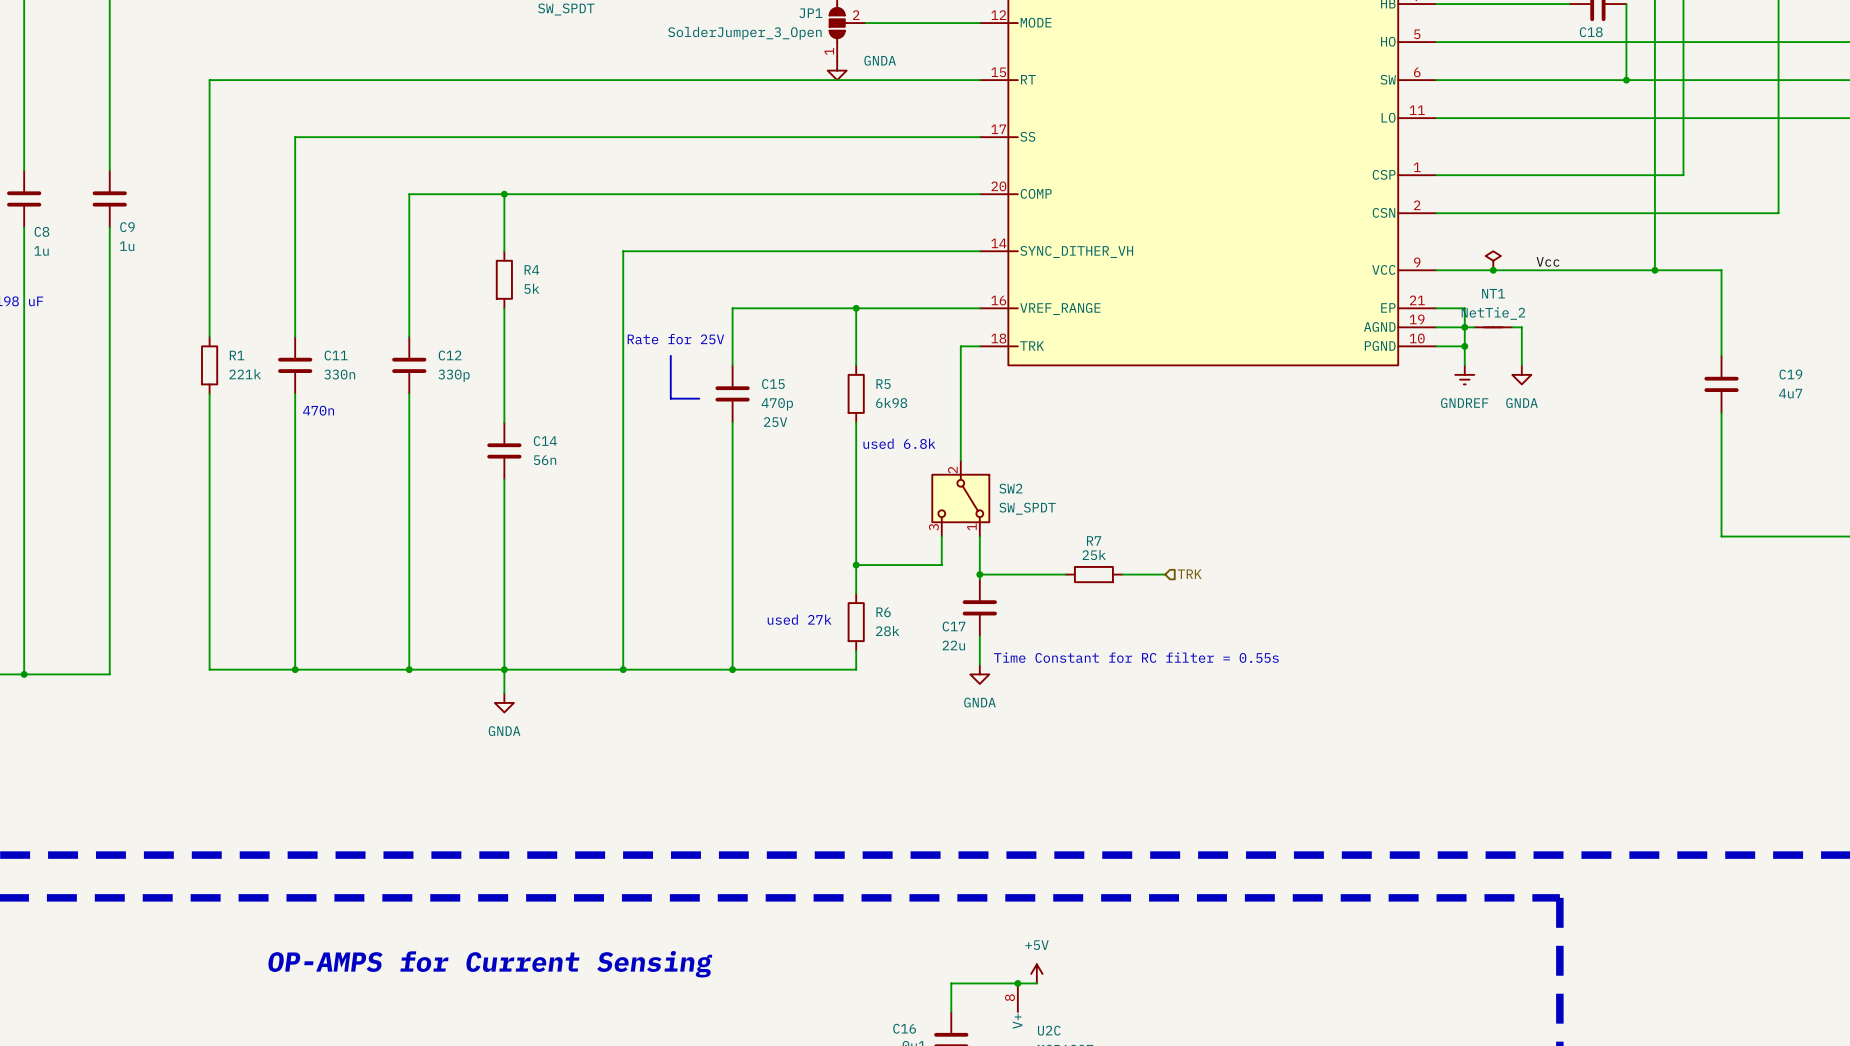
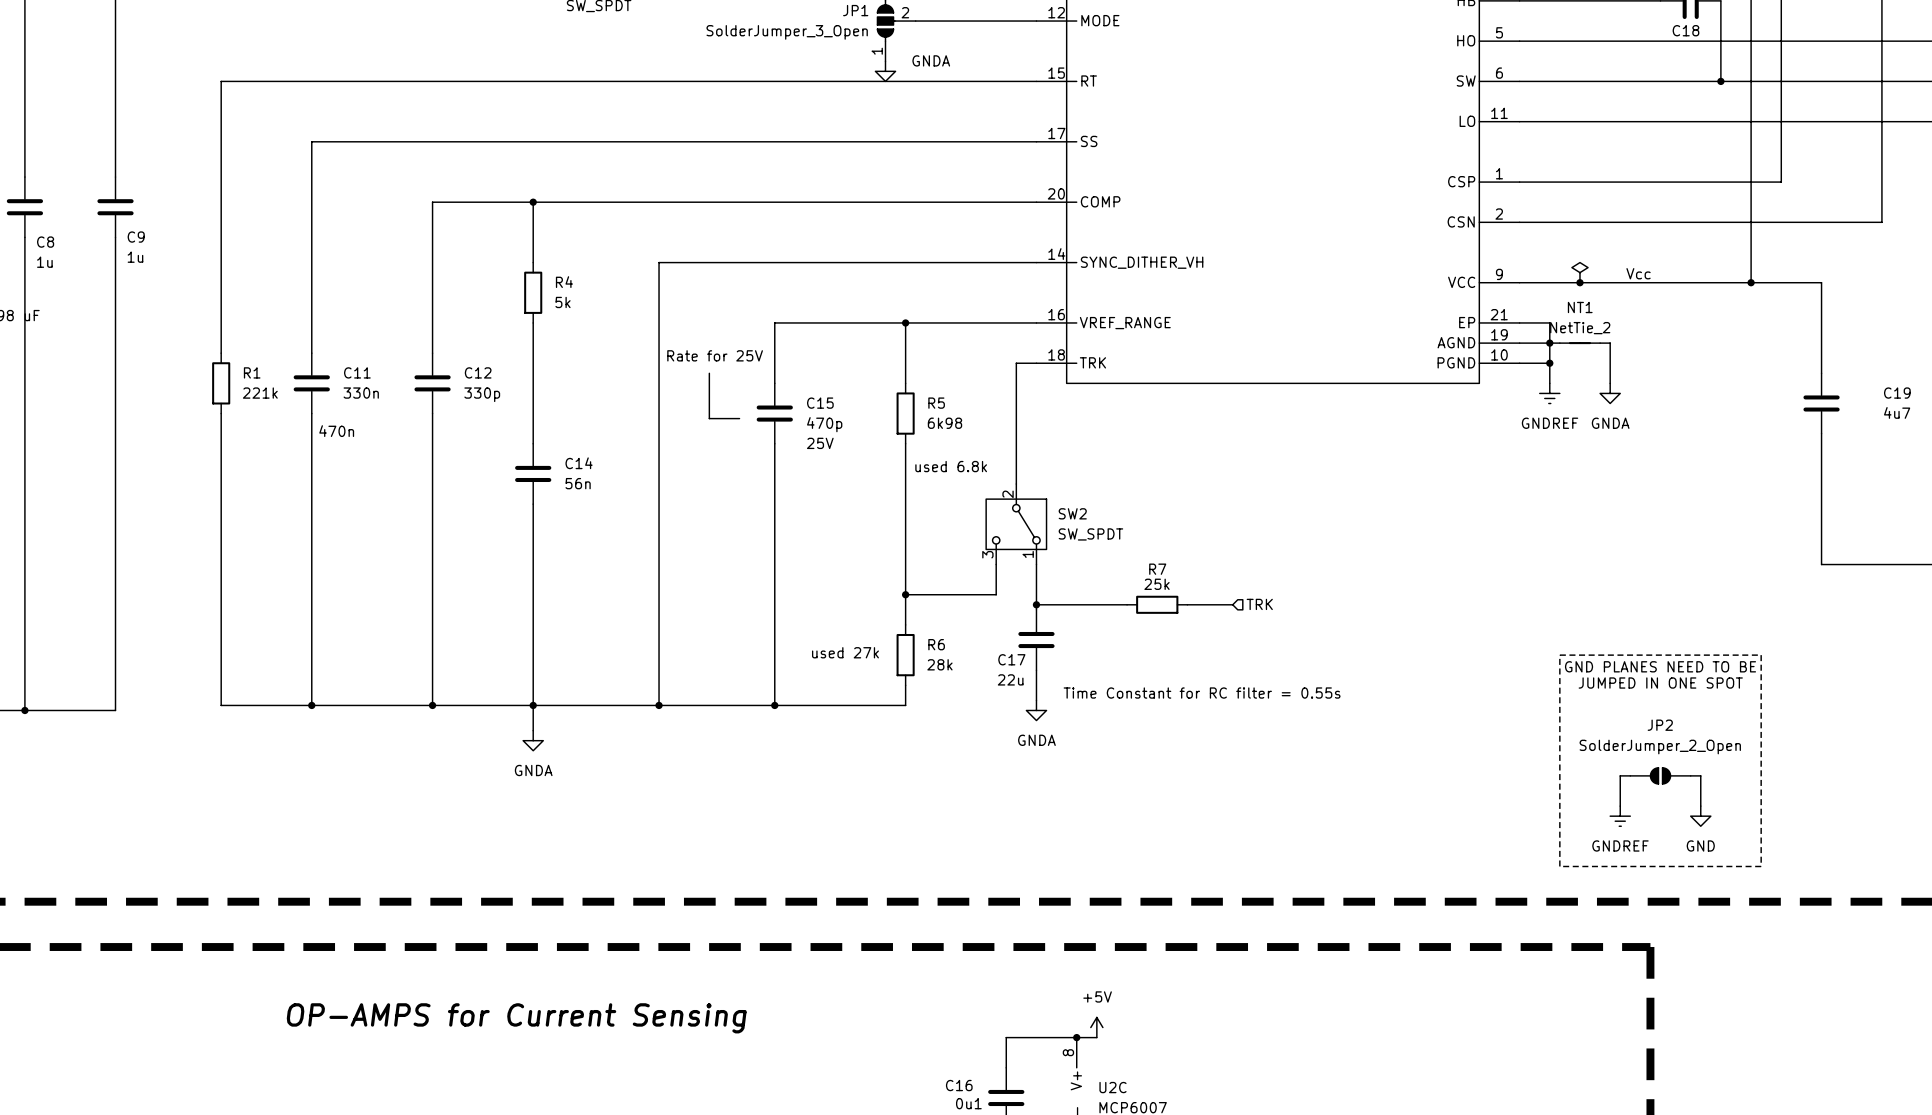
line: none -> (1559, 655) (1761, 655) (1761, 866) (1559, 866) (1559, 655)
text: none -> GND PLANES NEED TO BE (1660, 666)
text: none -> JUMPED IN ONE SPOT (1660, 683)
wire: none -> (1630, 775) (1620, 775) (1620, 806)
JP2: none -> SolderJumper_2_Open (1660, 775)
wire: none -> (1690, 775) (1700, 775) (1700, 806)
power symbol: none -> GNDREF (1620, 816)
power symbol: none -> GND (1700, 816)

